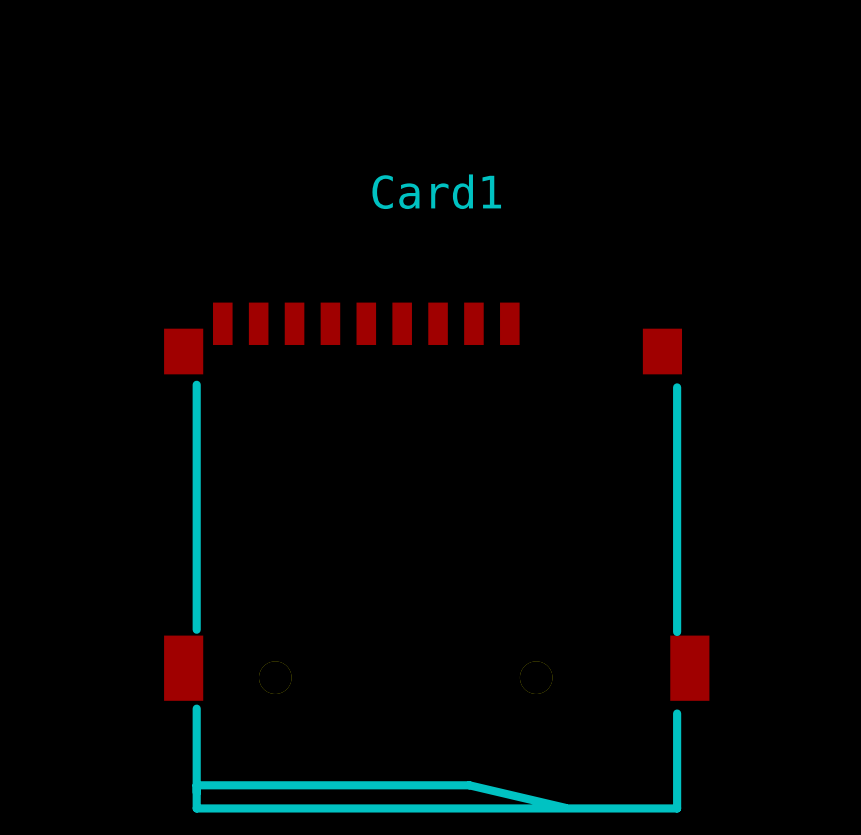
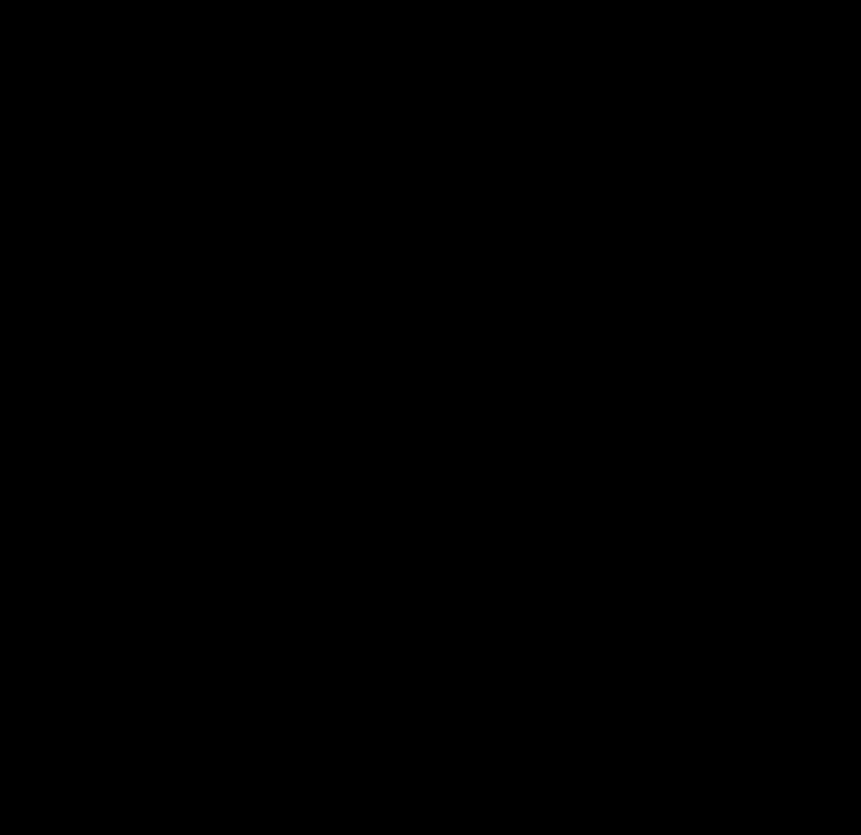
Card1: (436, 557) -> none

